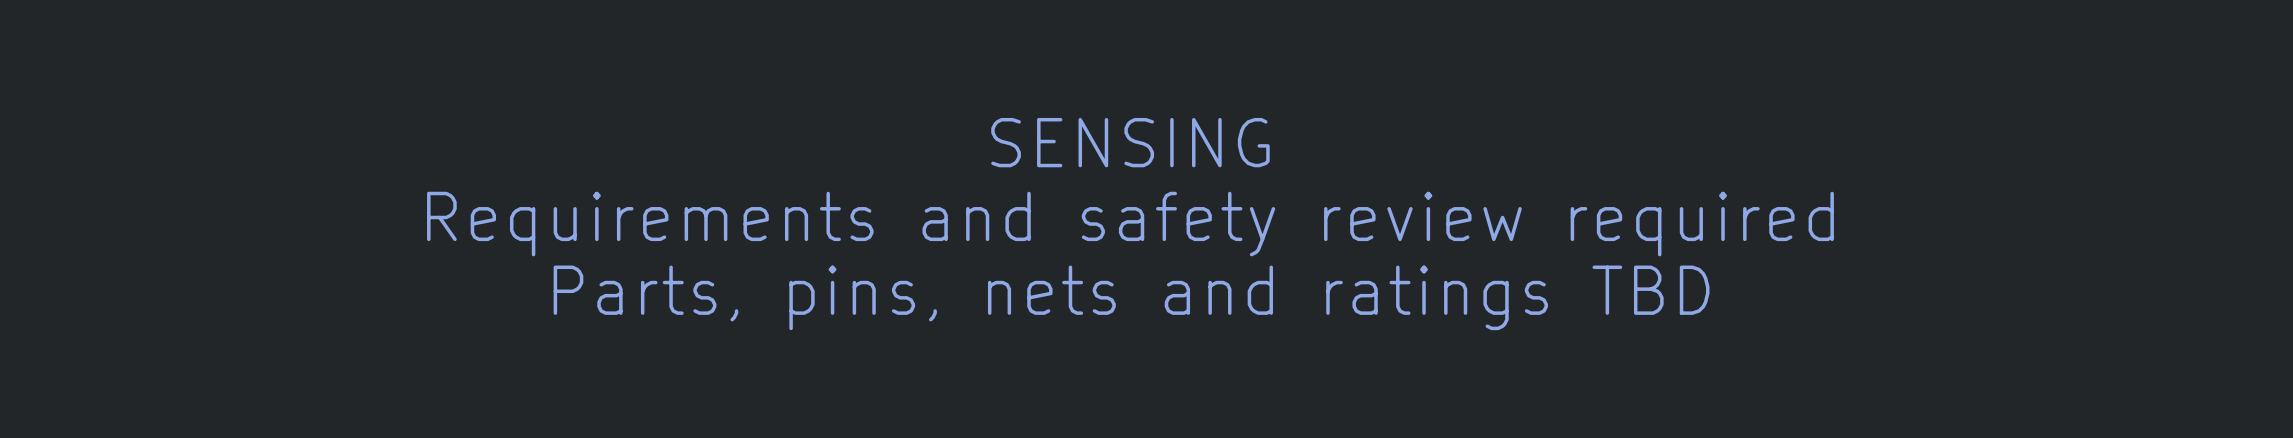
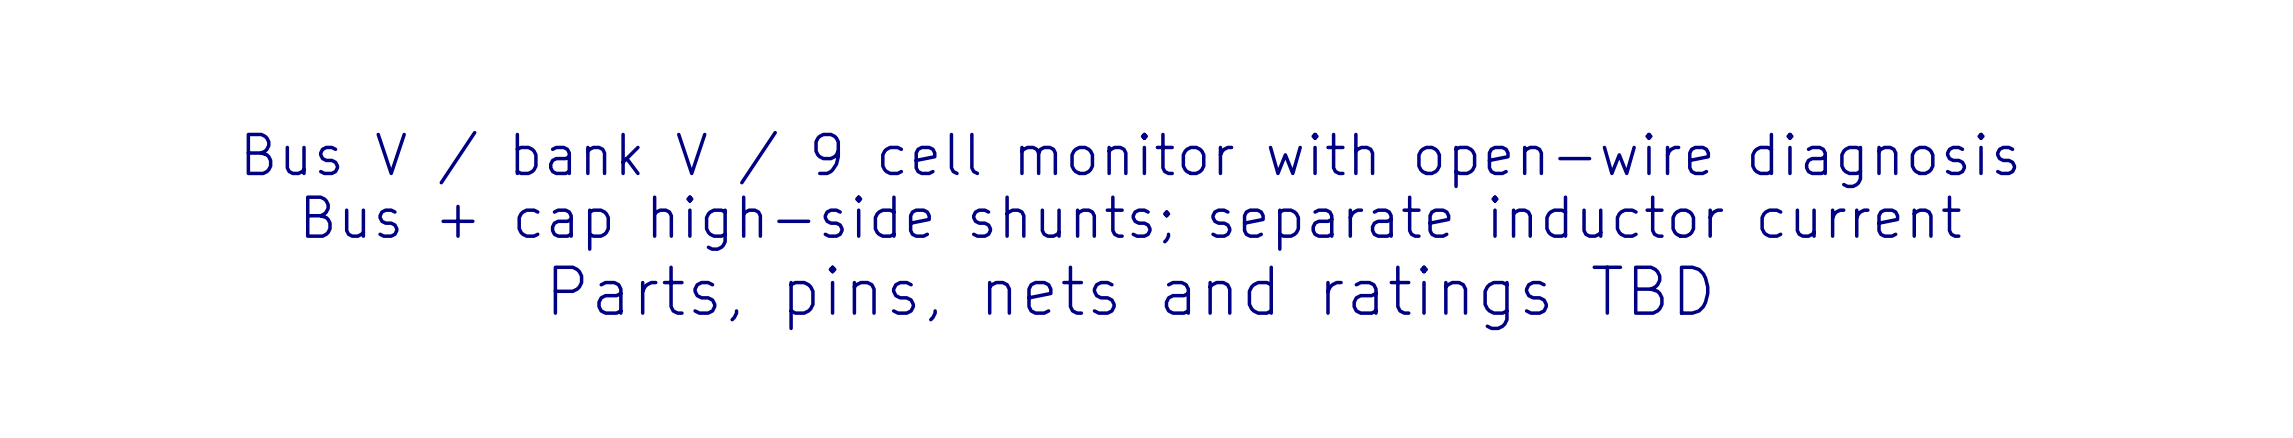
text: SENSING (1130, 142) -> Bus V / bank V / 9 cell monitor with open-wire diagnosis (1131, 159)
text: Requirements and safety review required (1130, 224) -> Bus + cap high-side shunts; separate inductor current (1133, 223)

